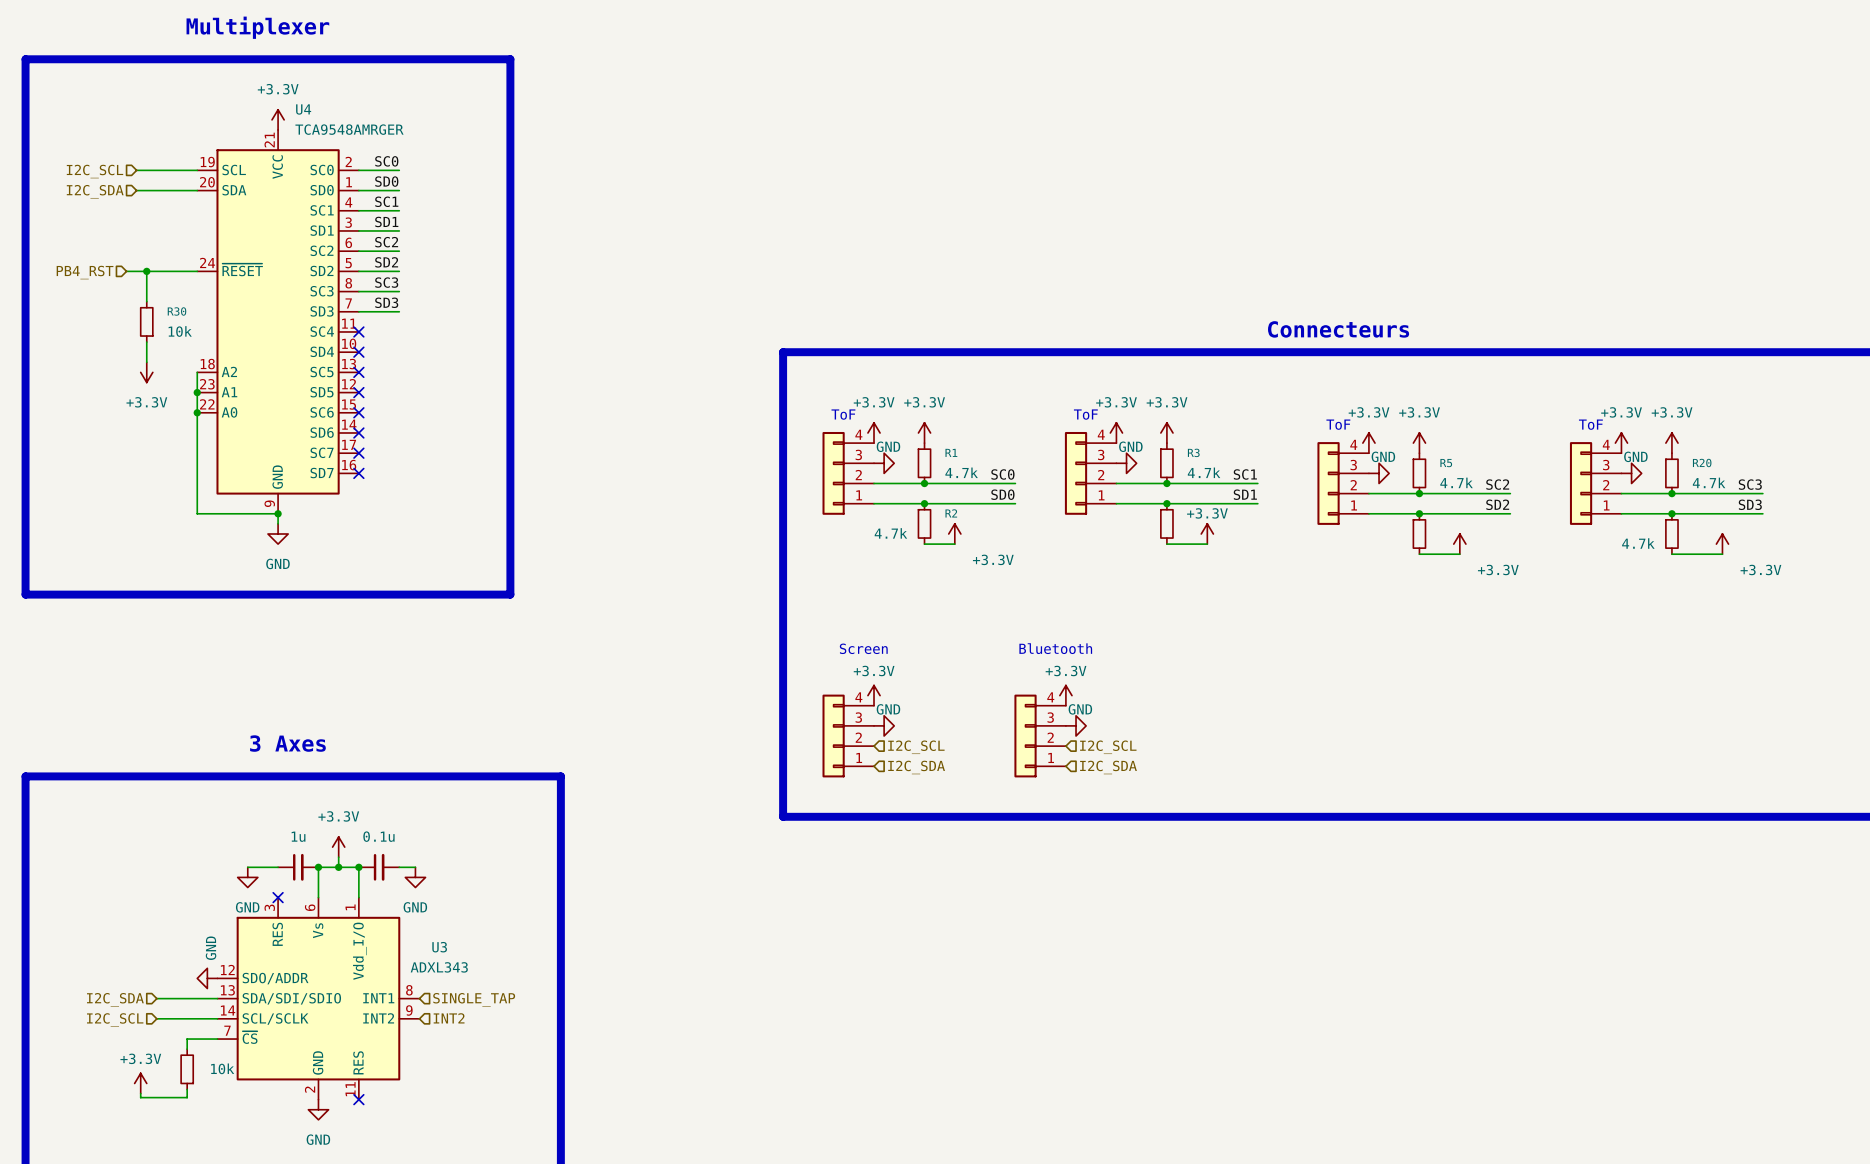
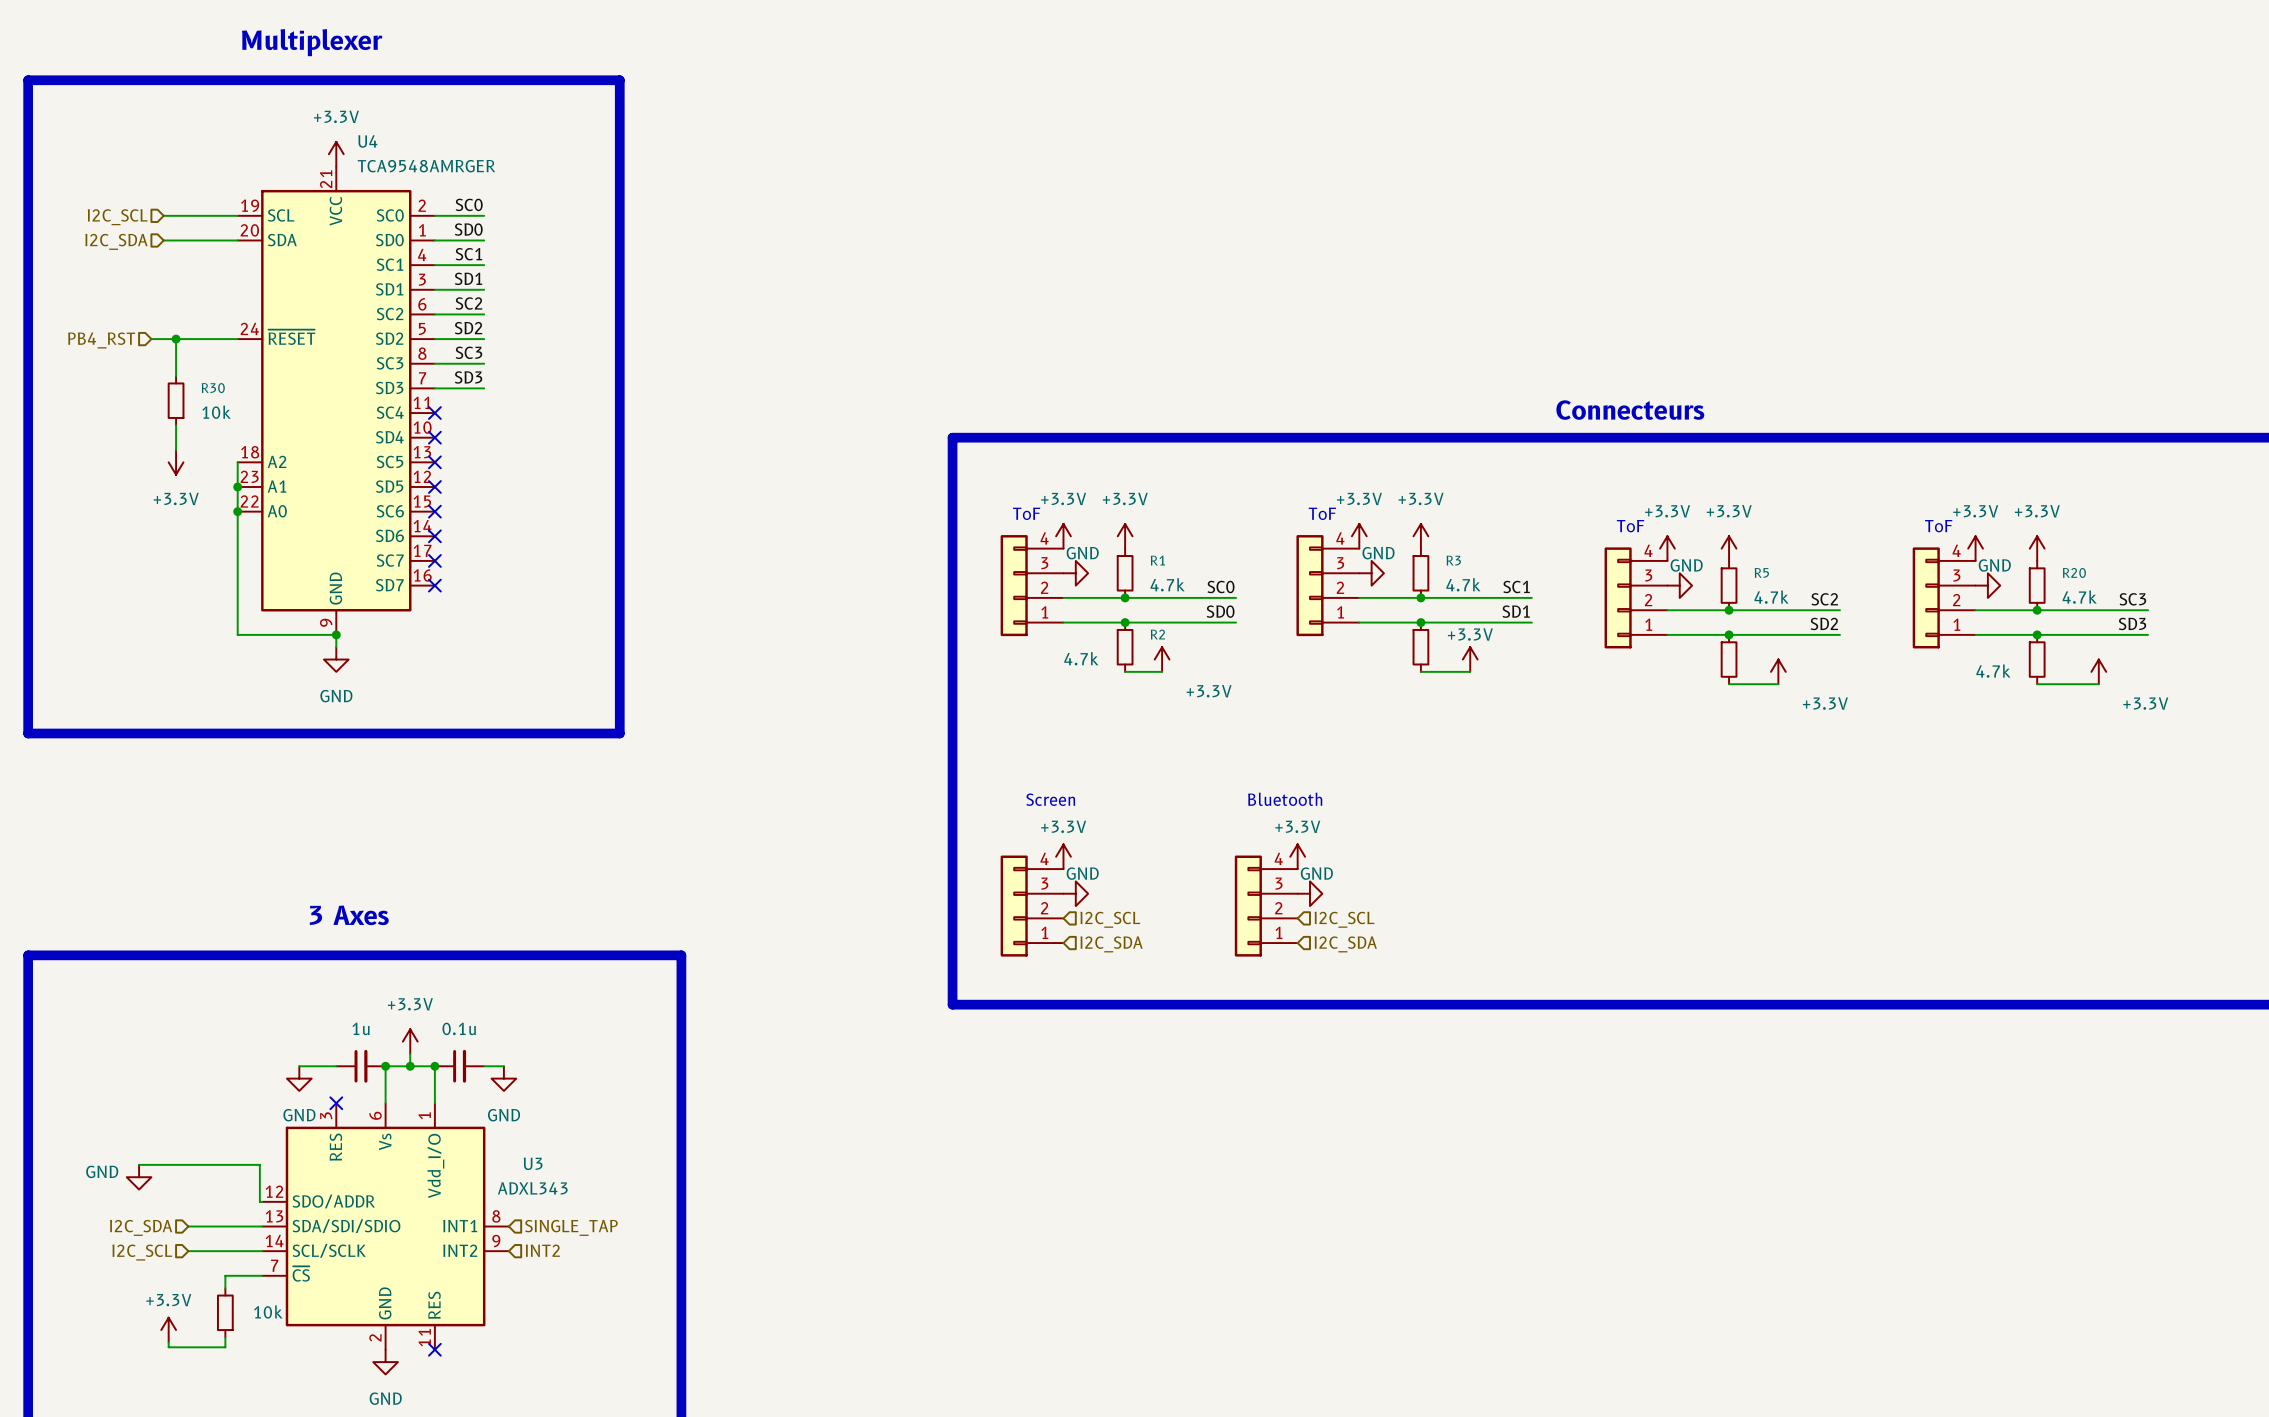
wire: none -> (139, 1164) (259, 1164) (259, 1201) (262, 1201)
power symbol rotation: 0° (207, 978) -> 90° counterclockwise (139, 1177)
power symbol position: GND (207, 978) -> GND (139, 1177)

